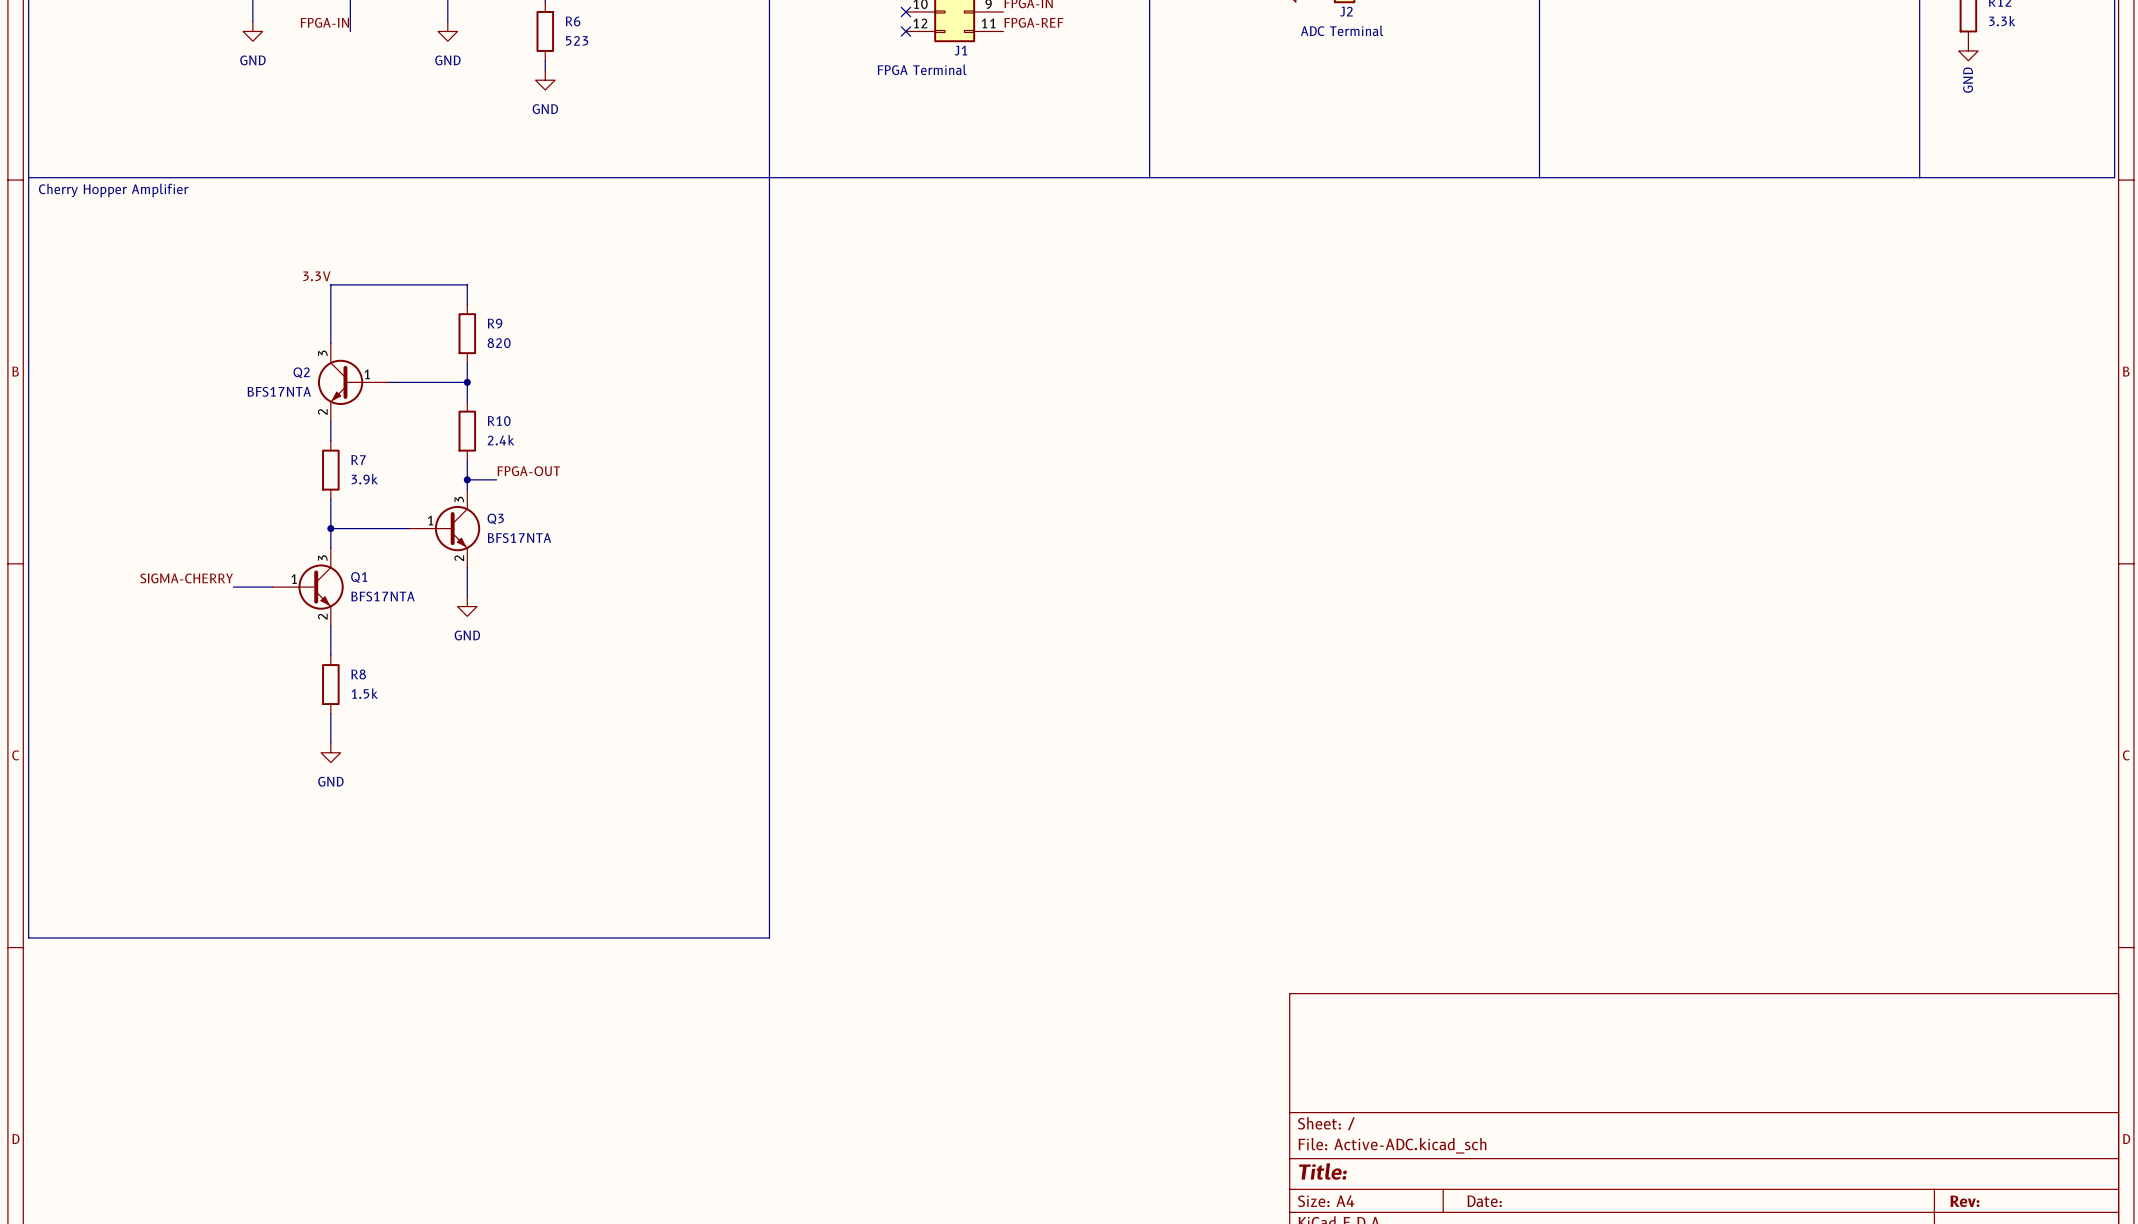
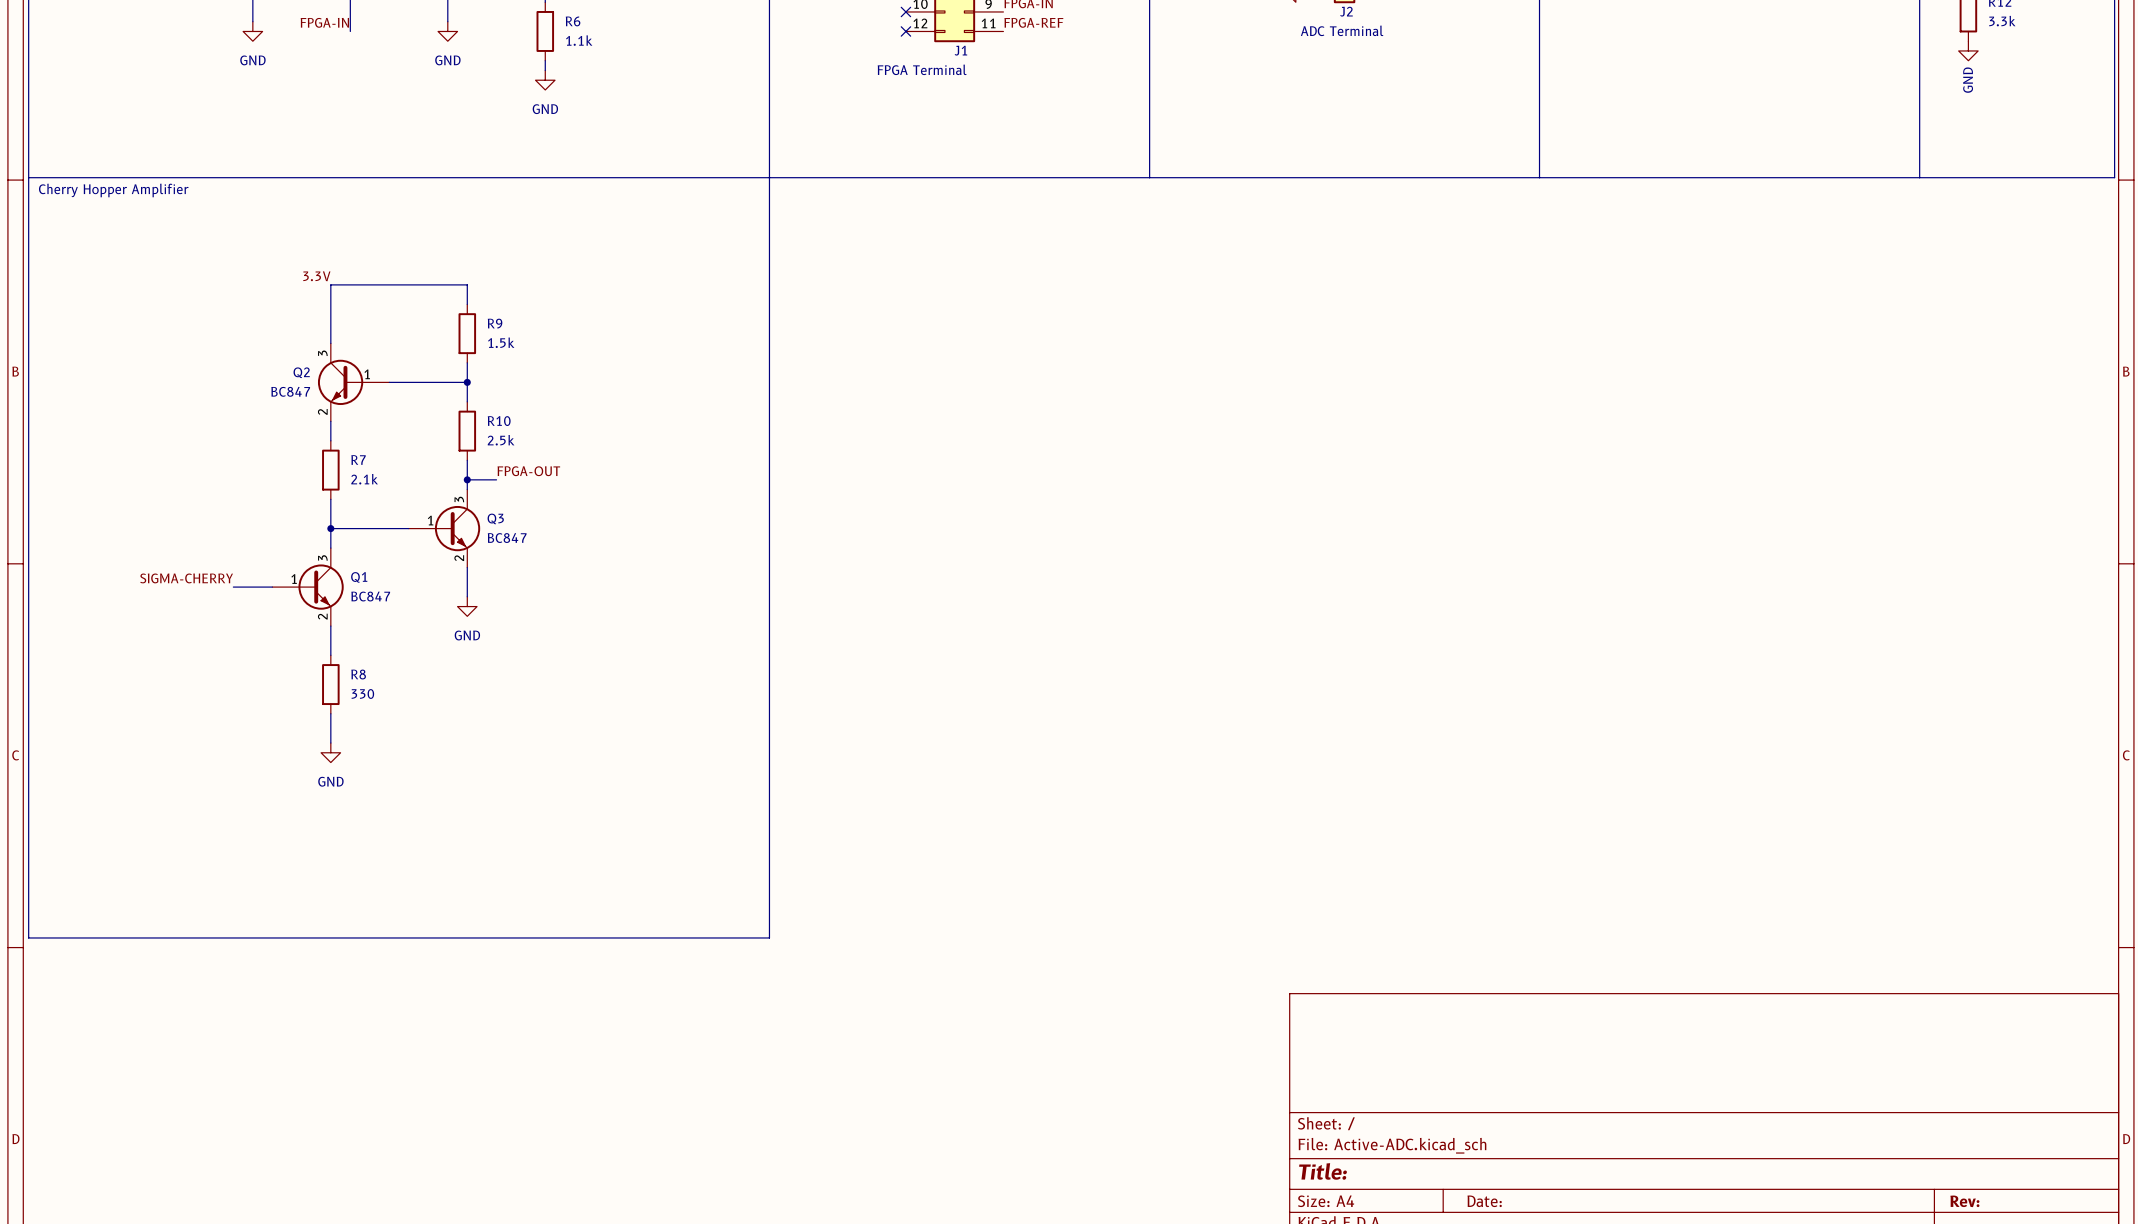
R6 value: 523 (577, 40) -> 1.1k (579, 40)
R9 value: 820 (499, 343) -> 1.5k (501, 342)
Q2 value: BFS17NTA (279, 391) -> BC847 (290, 391)
R10 value: 2.4k (501, 440) -> 2.5k (501, 440)
R7 value: 3.9k (364, 479) -> 2.1k (364, 479)
Q3 value: BFS17NTA (519, 538) -> BC847 (507, 538)
Q1 value: BFS17NTA (383, 596) -> BC847 (370, 596)
R8 value: 1.5k (364, 693) -> 330 (362, 694)

